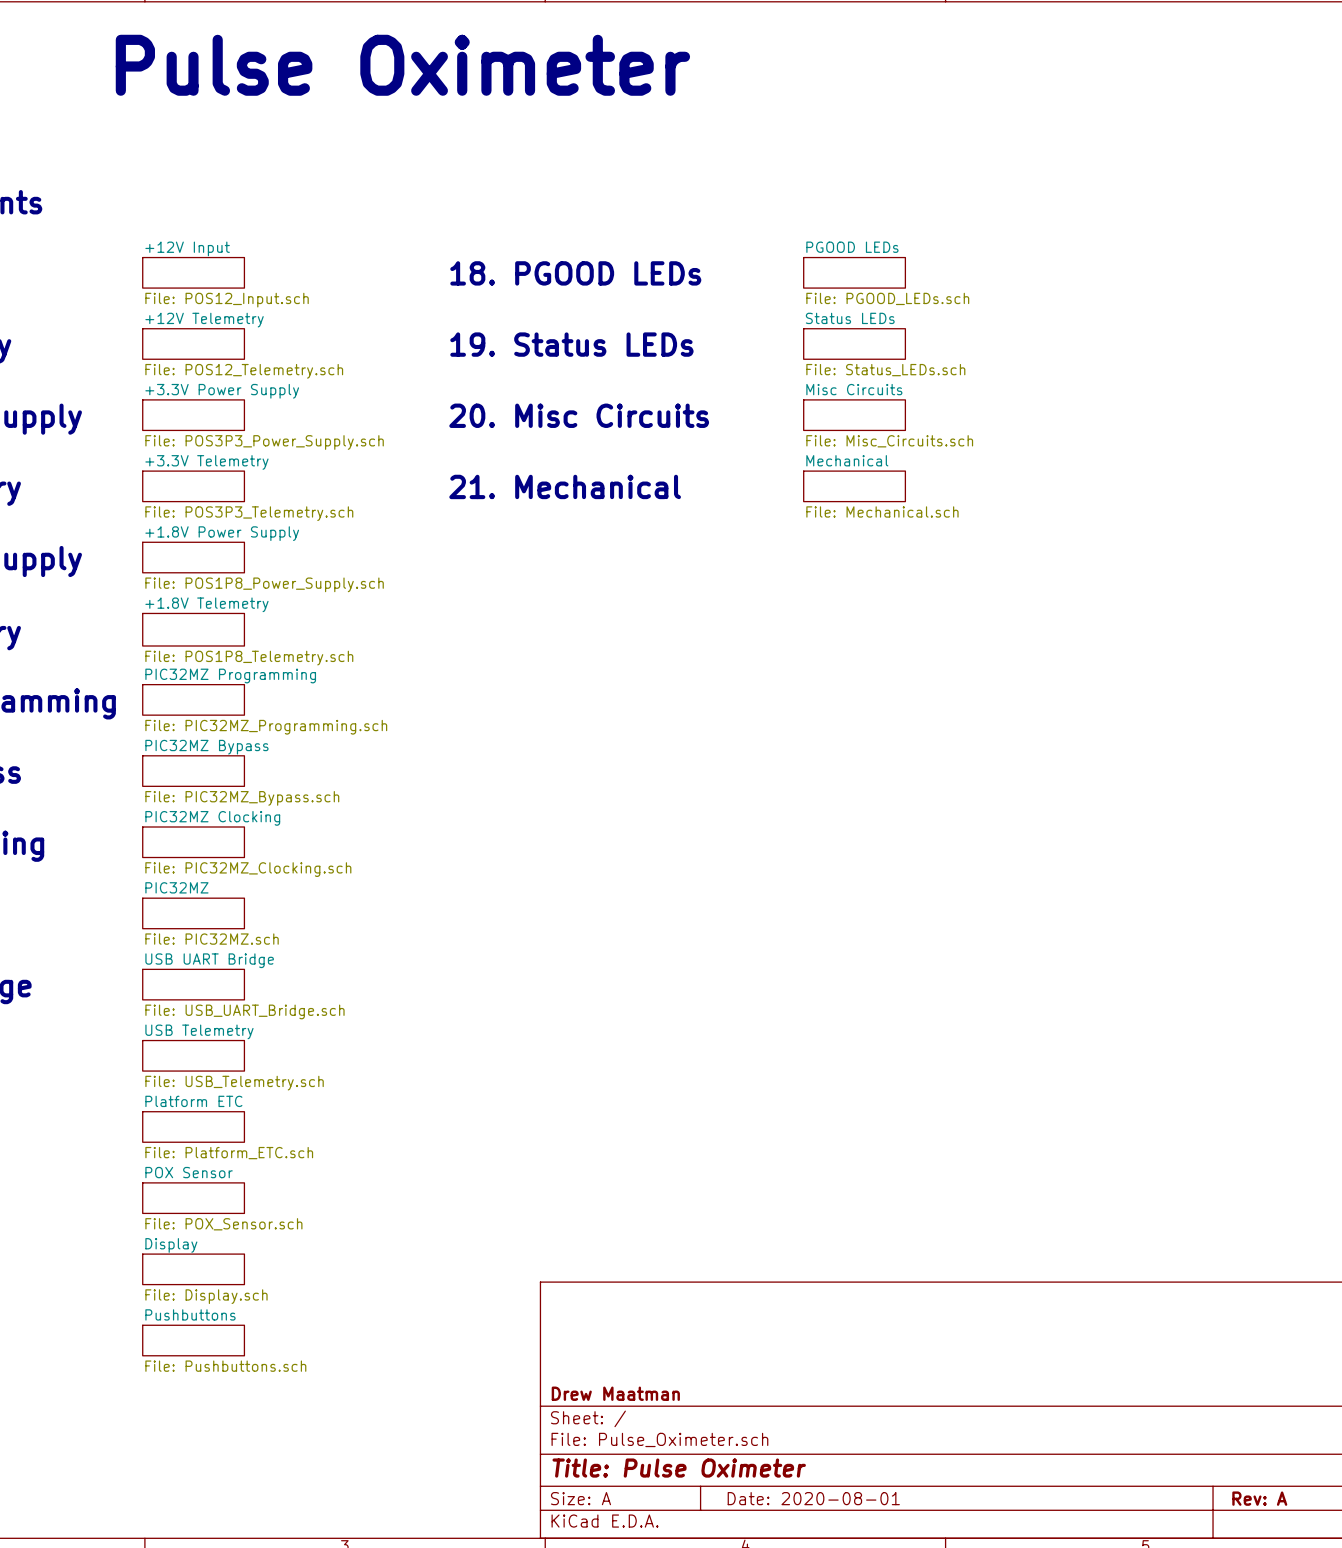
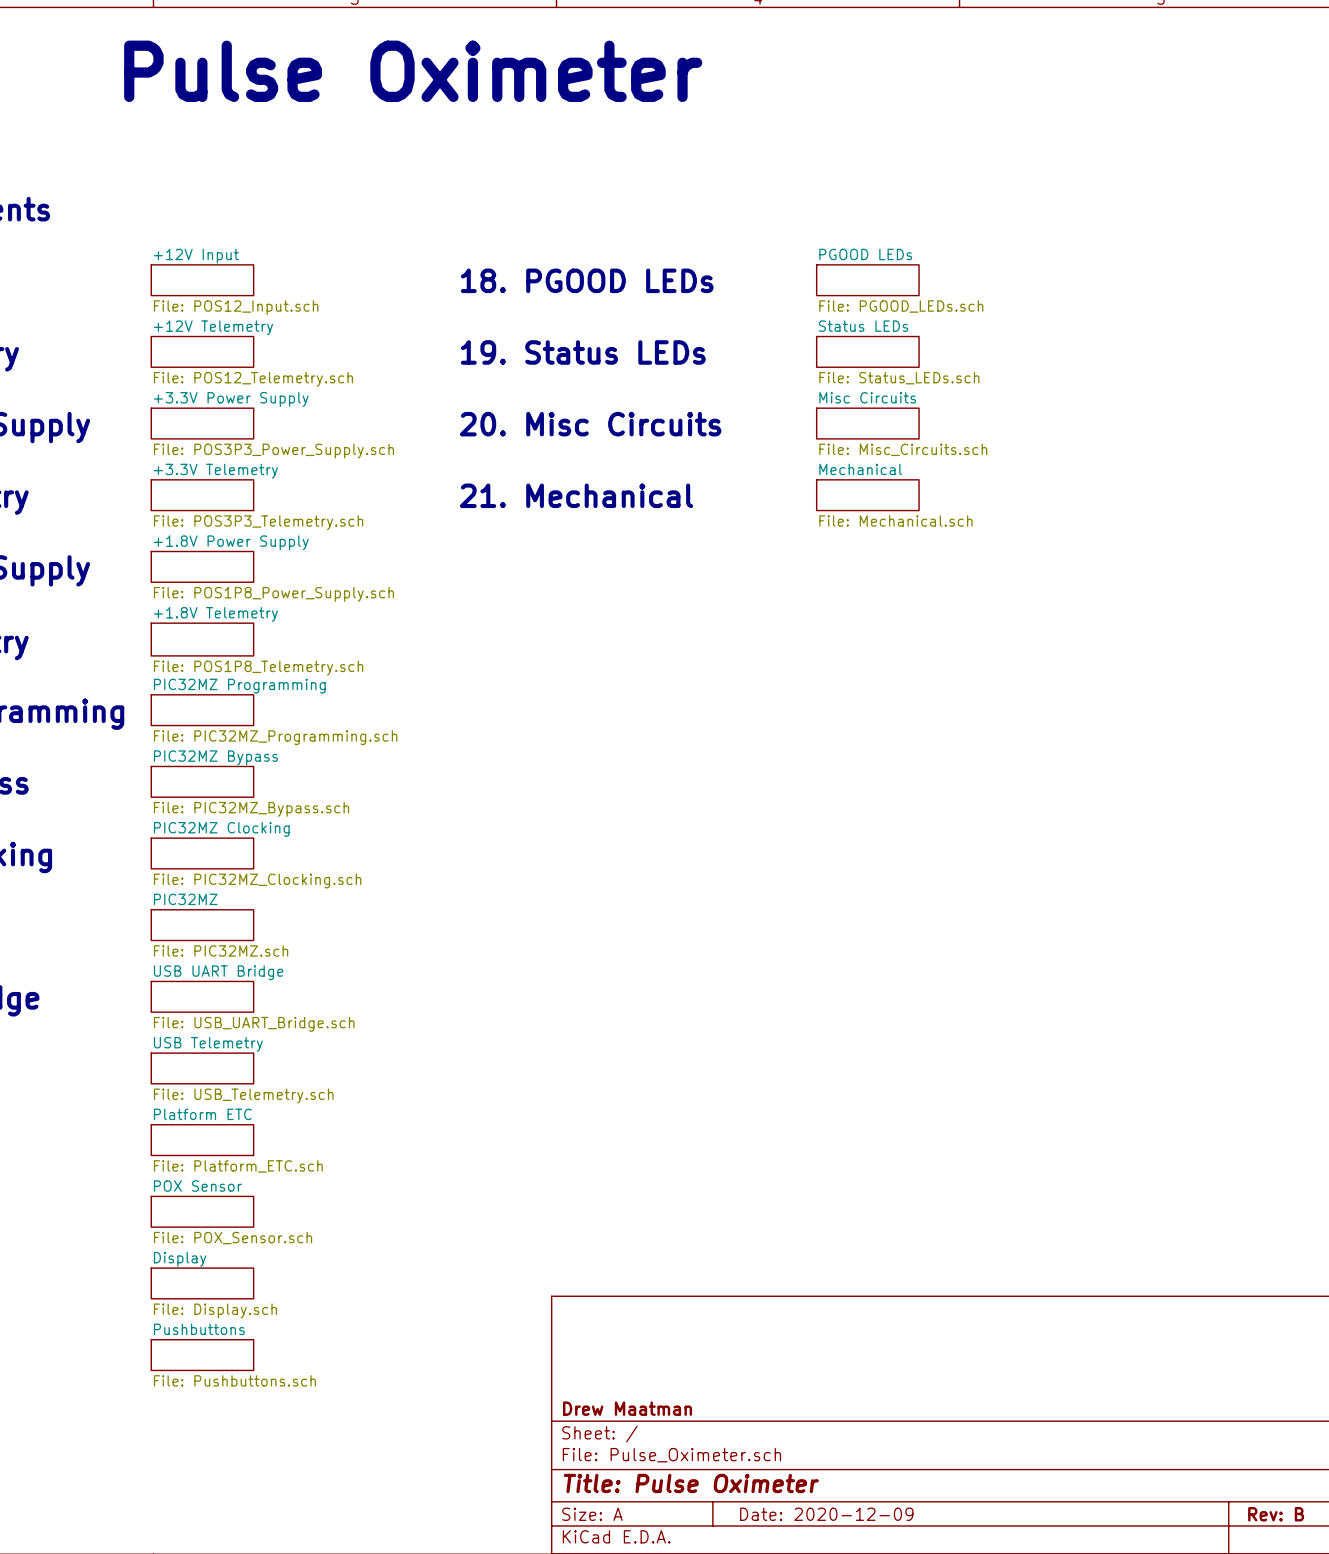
title block: Date: 2020-08-01 (813, 1498) -> Date: 2020-12-09 (826, 1514)
title block: Rev: A (1259, 1498) -> Rev: B (1276, 1514)

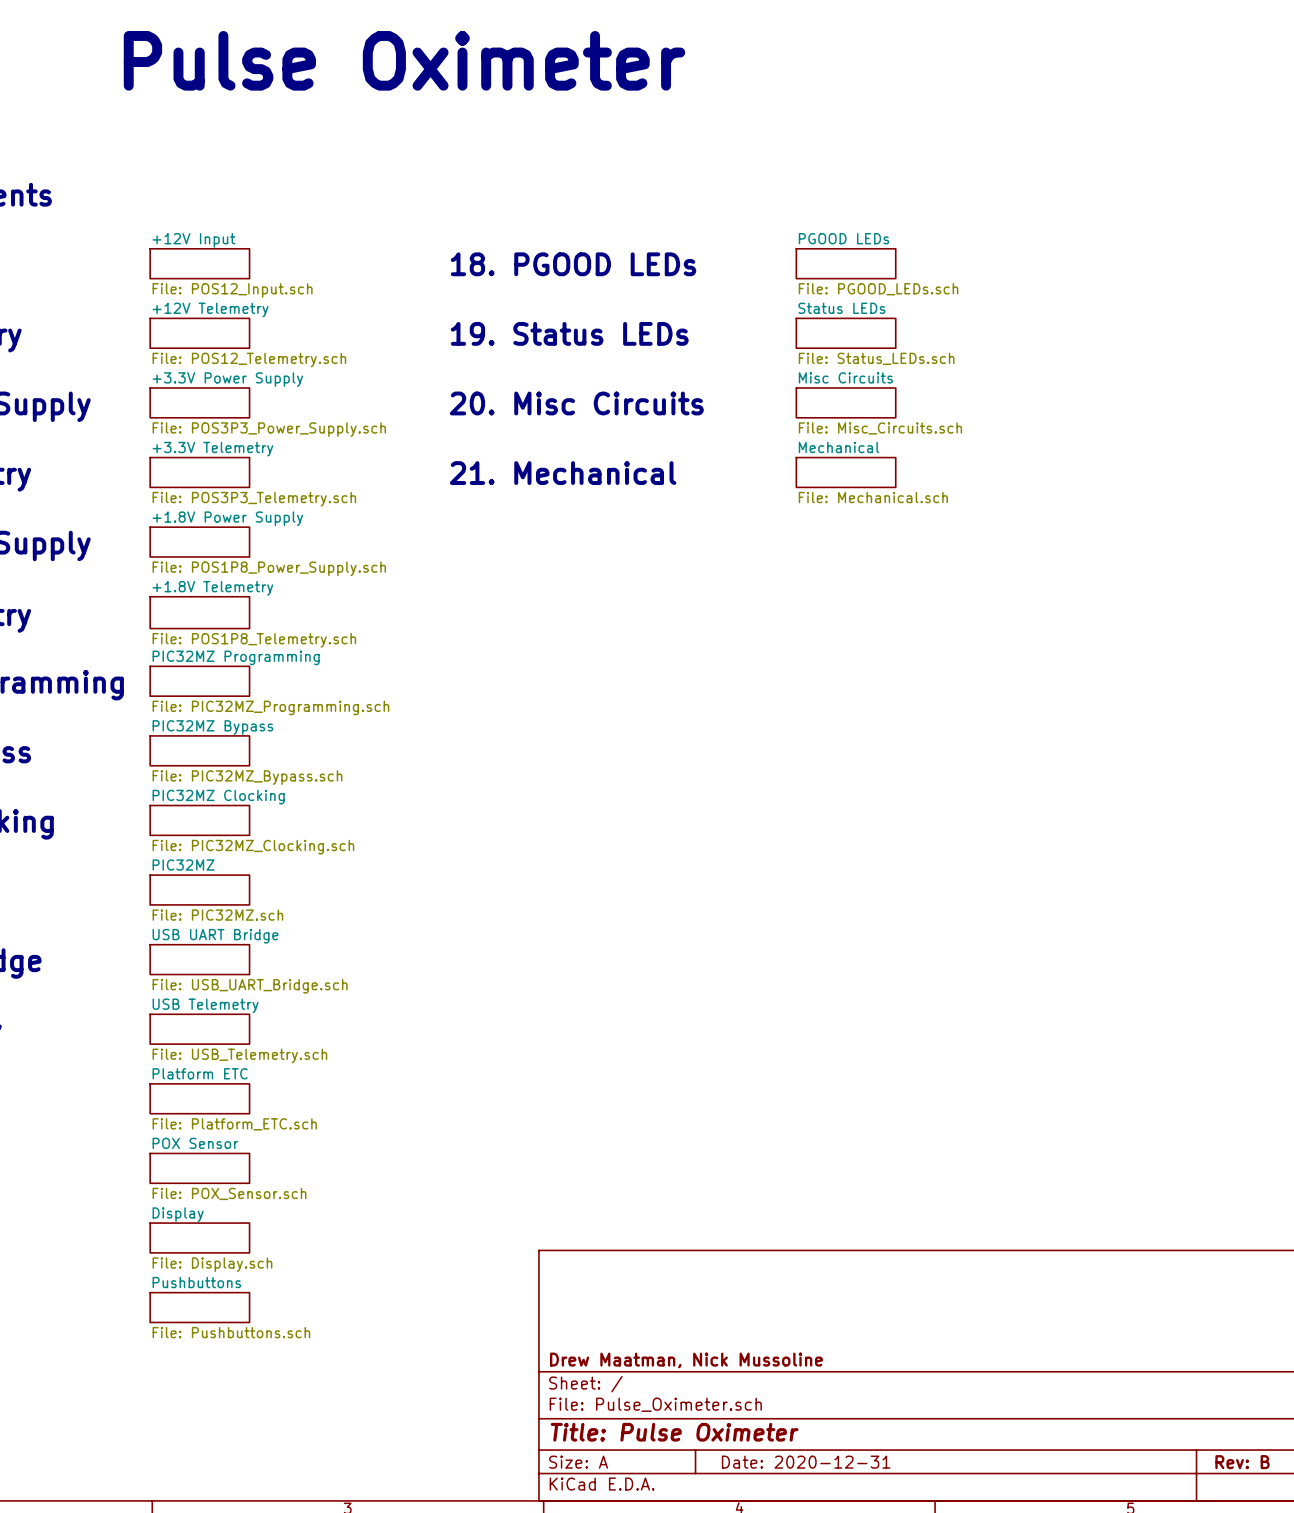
title block: Drew Maatman (627, 1408) -> Drew Maatman, Nick Mussoline (686, 1360)
title block: Date: 2020-12-09 (826, 1514) -> Date: 2020-12-31 (806, 1462)

